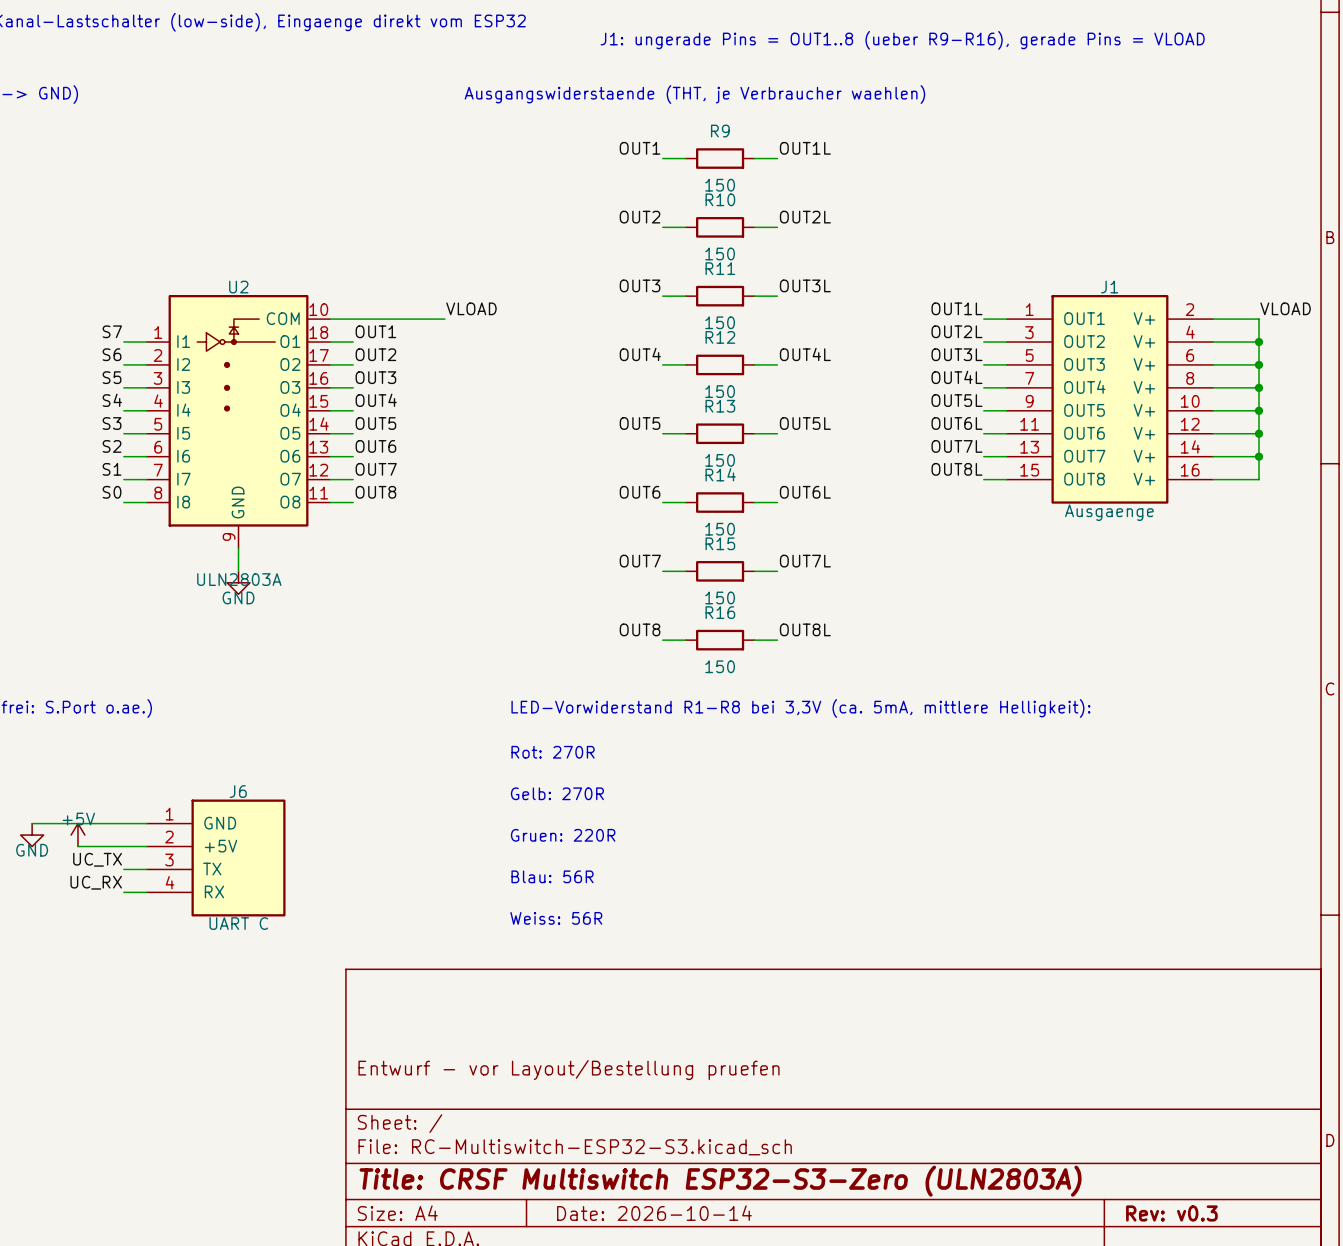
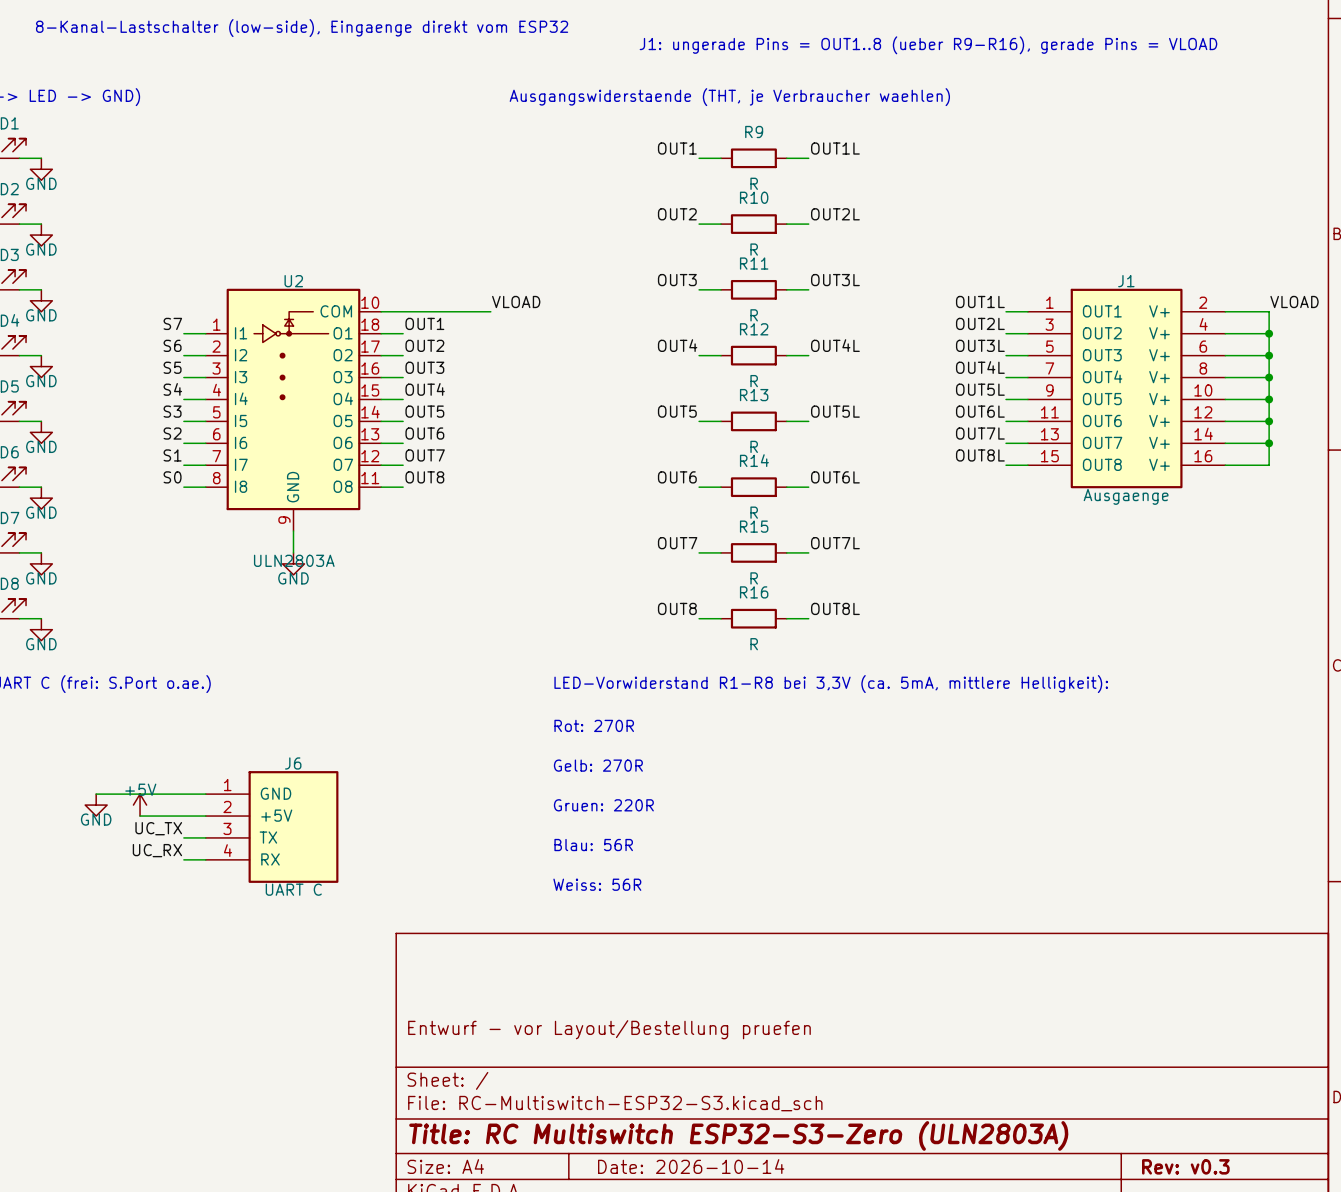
R9 value: 150 (720, 185) -> R (754, 183)
R10 value: 150 (720, 254) -> R (754, 249)
R11 value: 150 (720, 322) -> R (754, 315)
R12 value: 150 (720, 391) -> R (754, 381)
R13 value: 150 (720, 460) -> R (754, 446)
R14 value: 150 (720, 529) -> R (754, 512)
R15 value: 150 (720, 597) -> R (754, 578)
R16 value: 150 (720, 666) -> R (754, 644)
title block: Title: CRSF Multiswitch ESP32-S3-Zero (ULN2803A) (720, 1181) -> Title: RC Multiswitch ESP32-S3-Zero (ULN2803A) (738, 1135)

